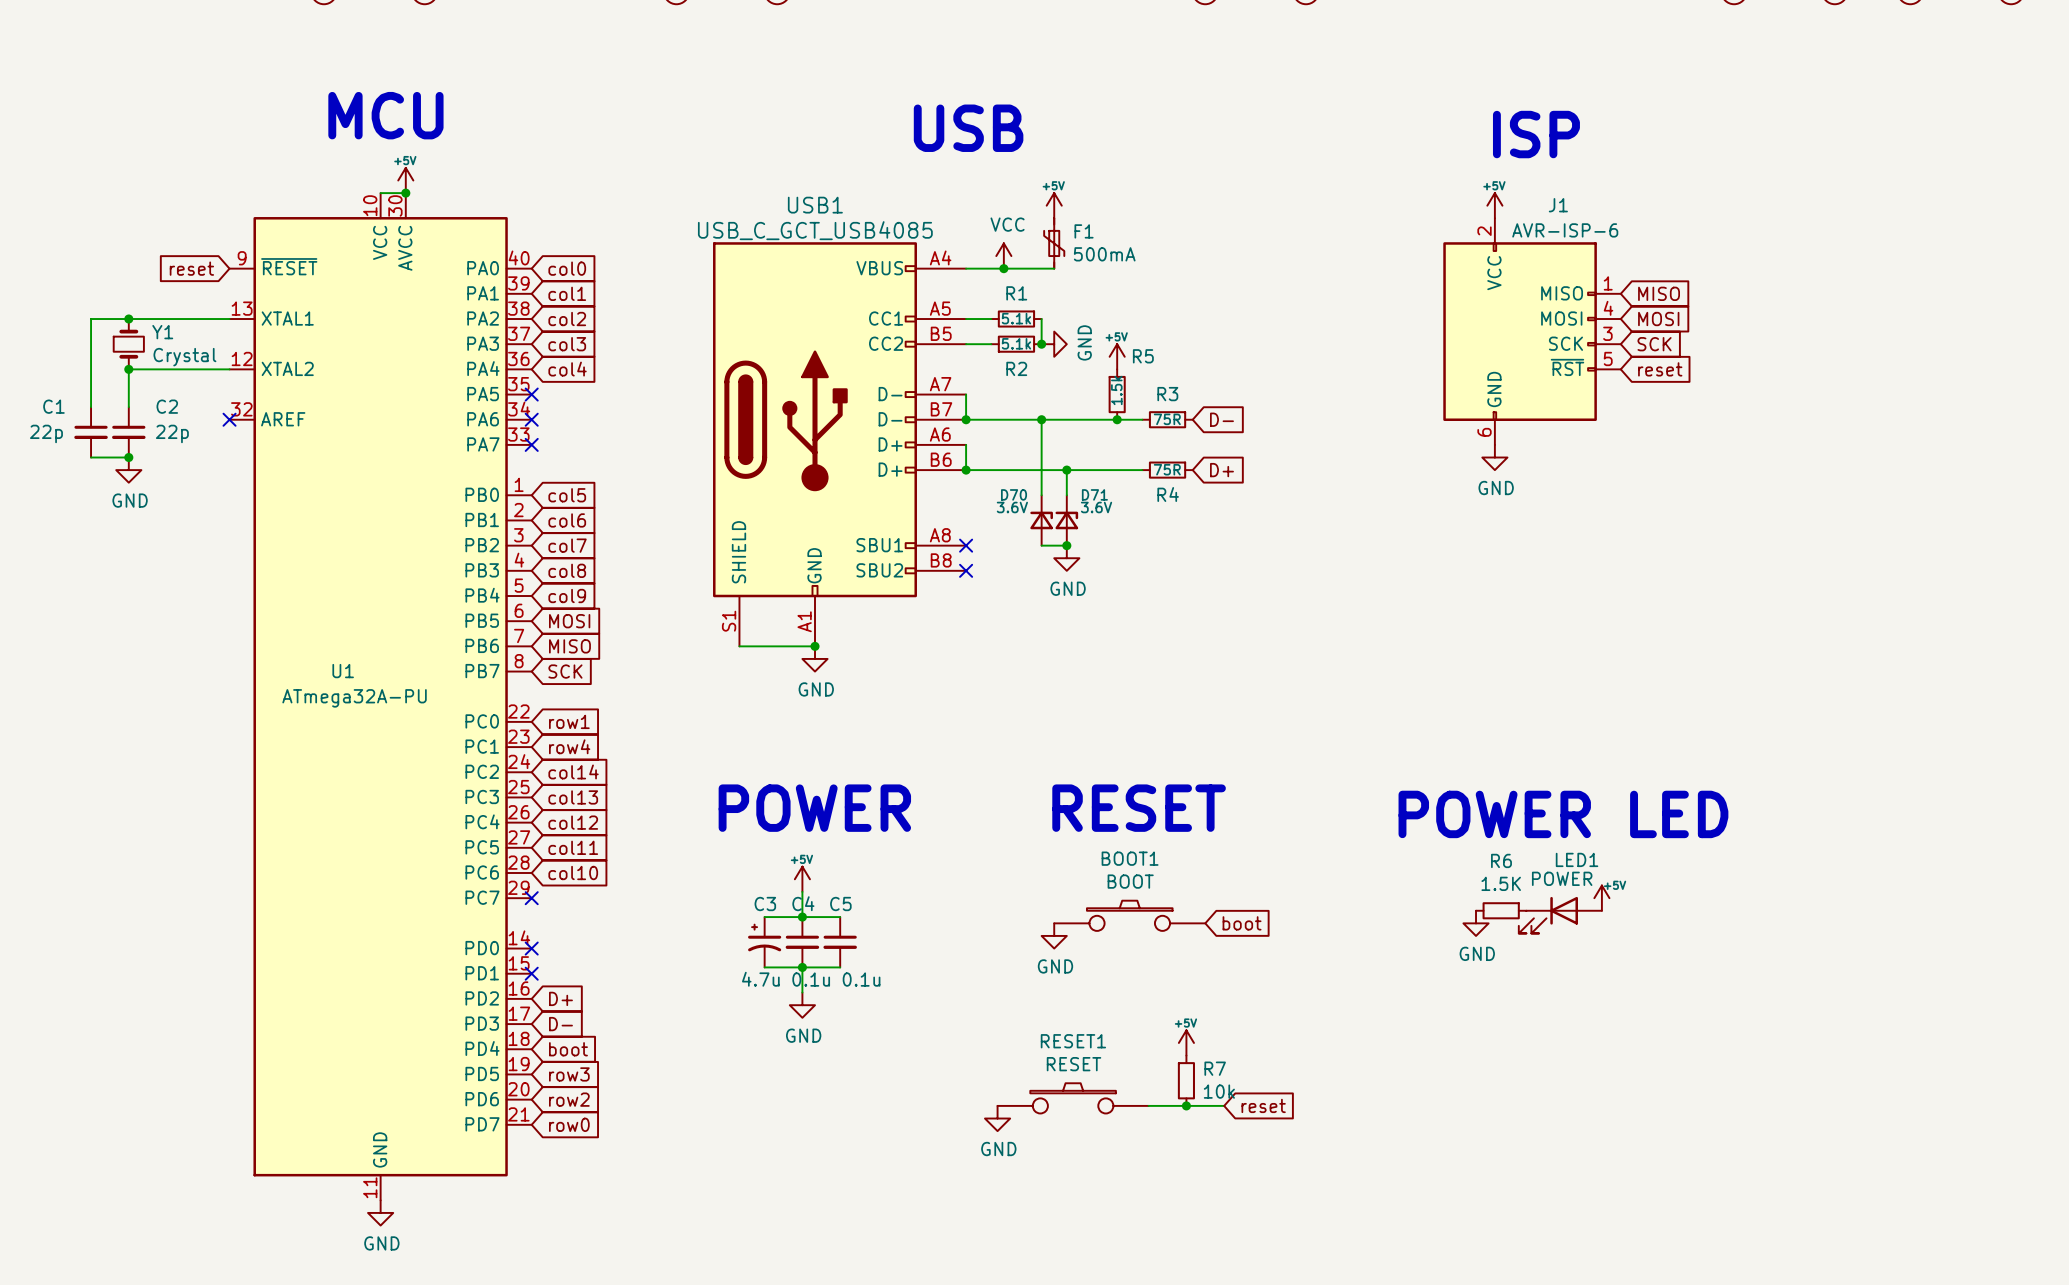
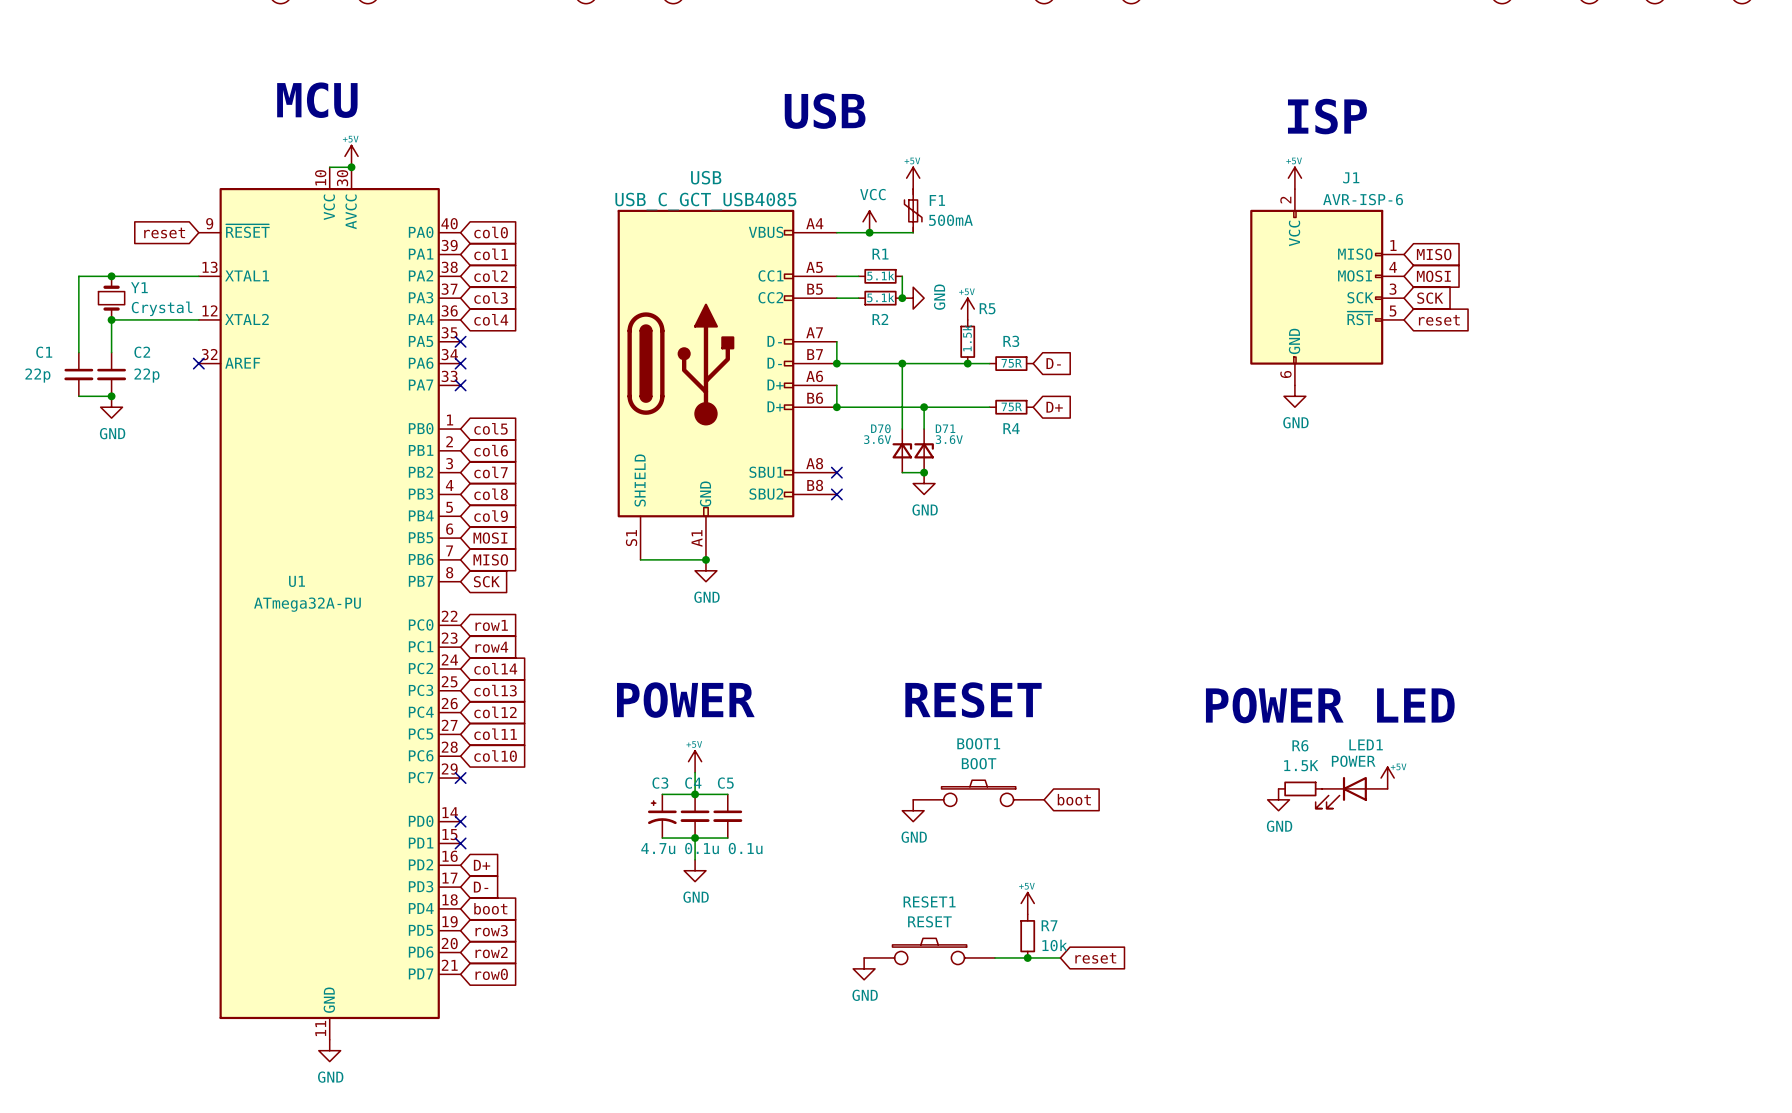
USB1 name: USB1 (815, 205) -> USB (706, 177)

